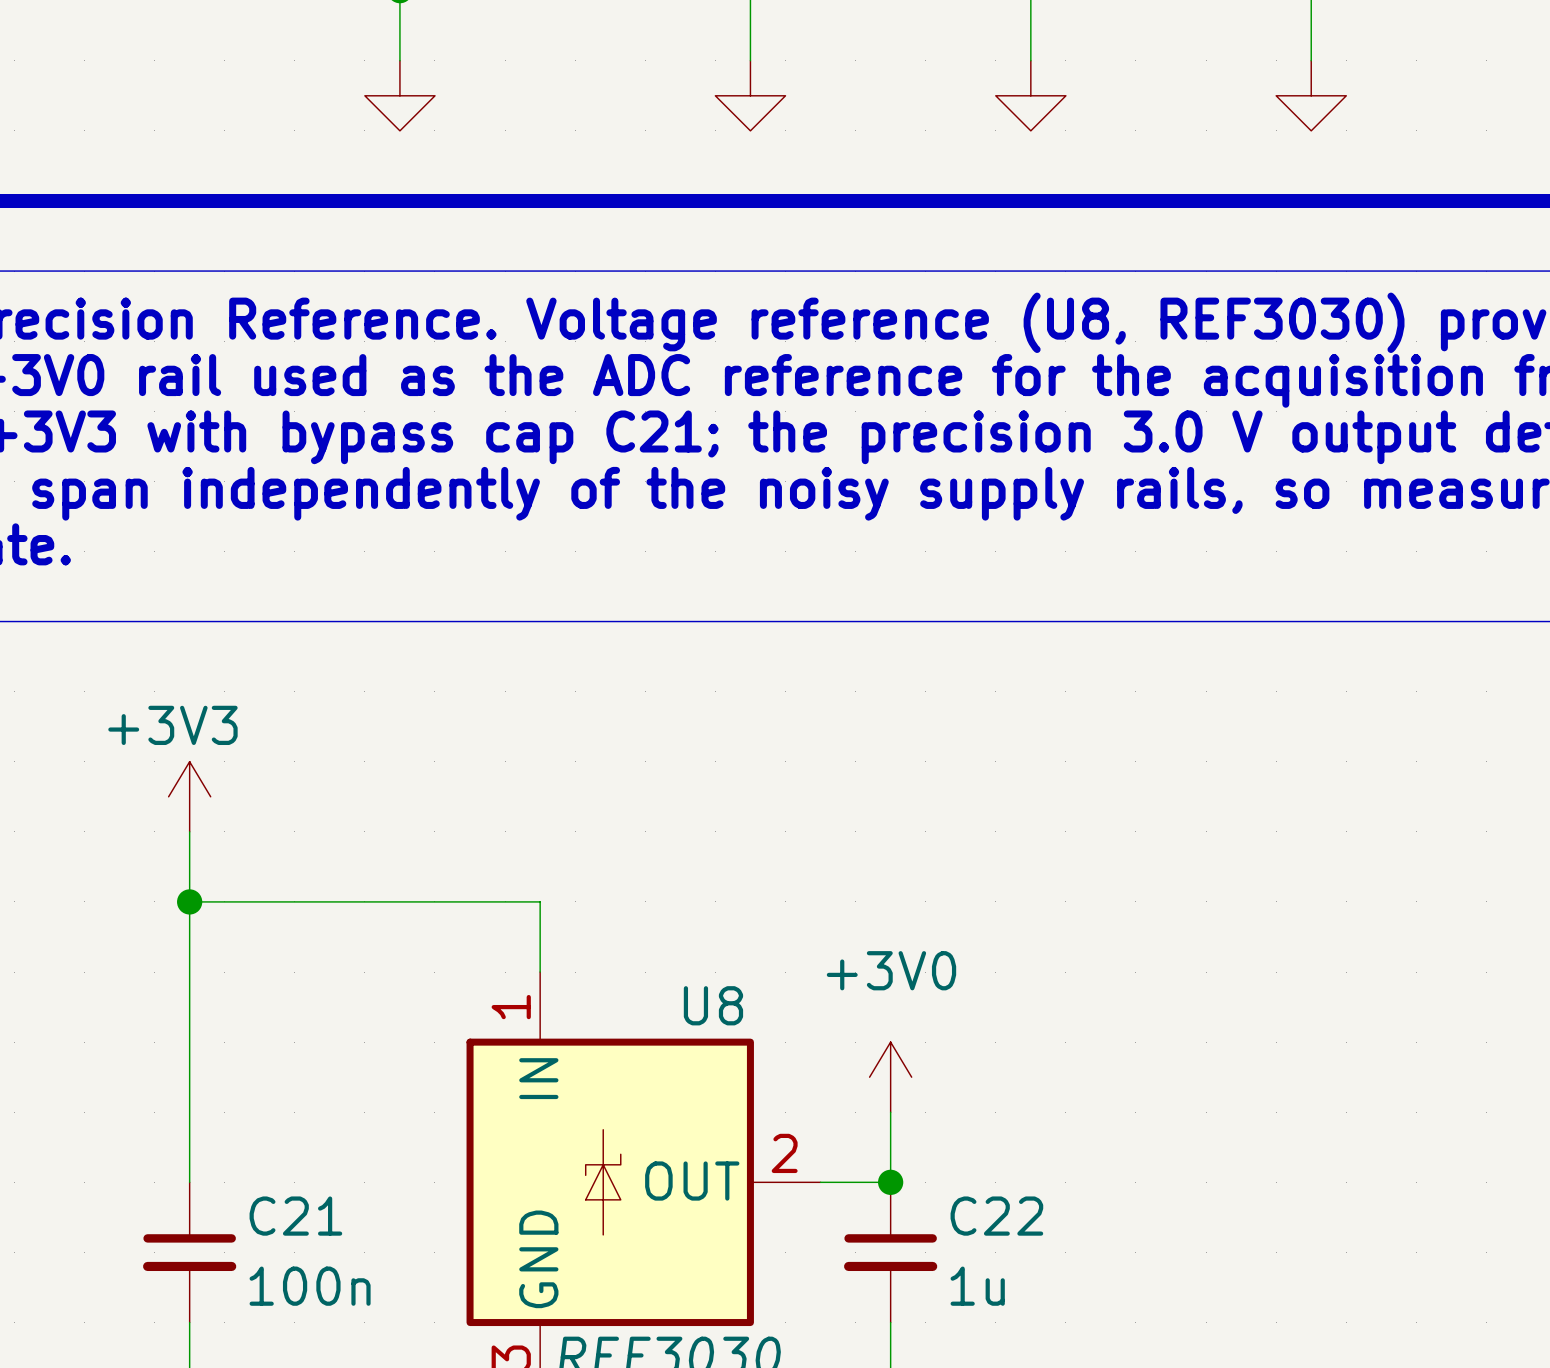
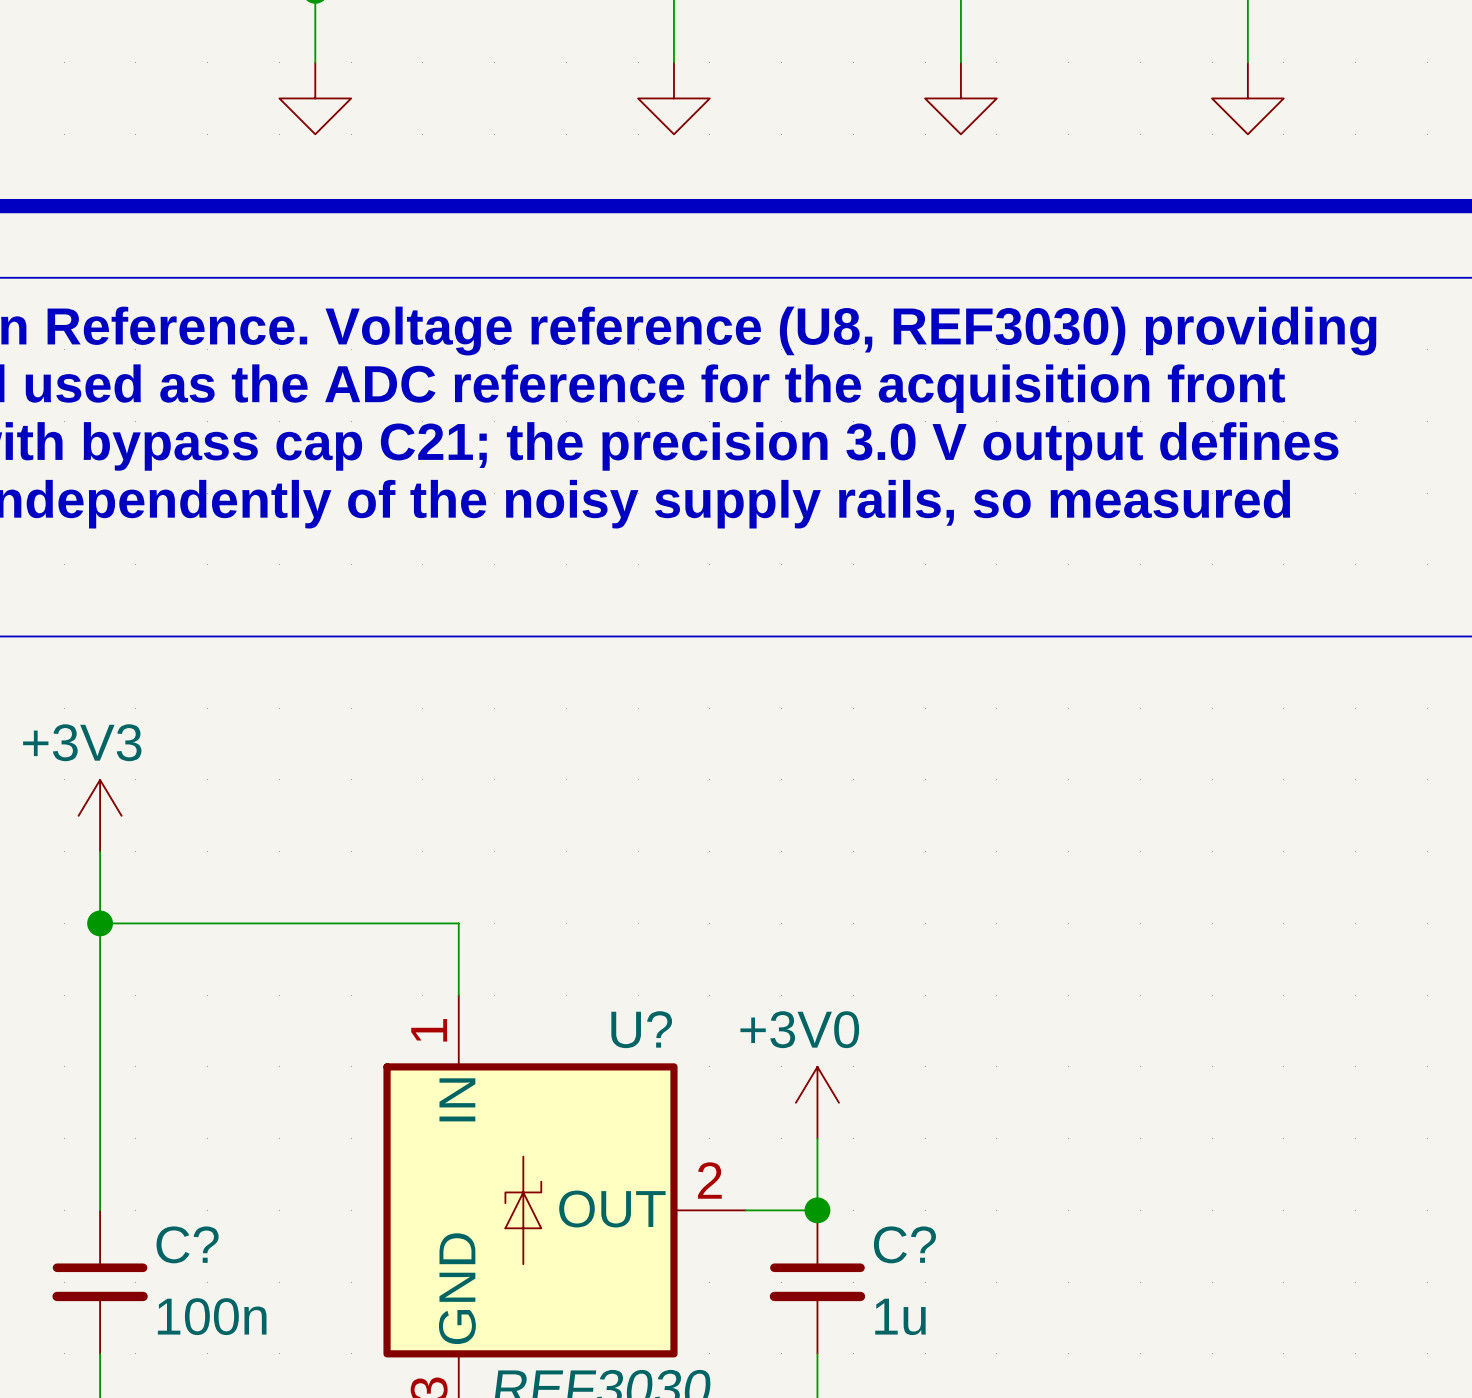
power symbol text position: +3V0 (891, 970) -> +3V0 (799, 1029)
U8 name: U8 (713, 1005) -> U? (641, 1029)
C21 name: C21 (295, 1216) -> C? (187, 1244)
C22 name: C22 (996, 1216) -> C? (904, 1244)

